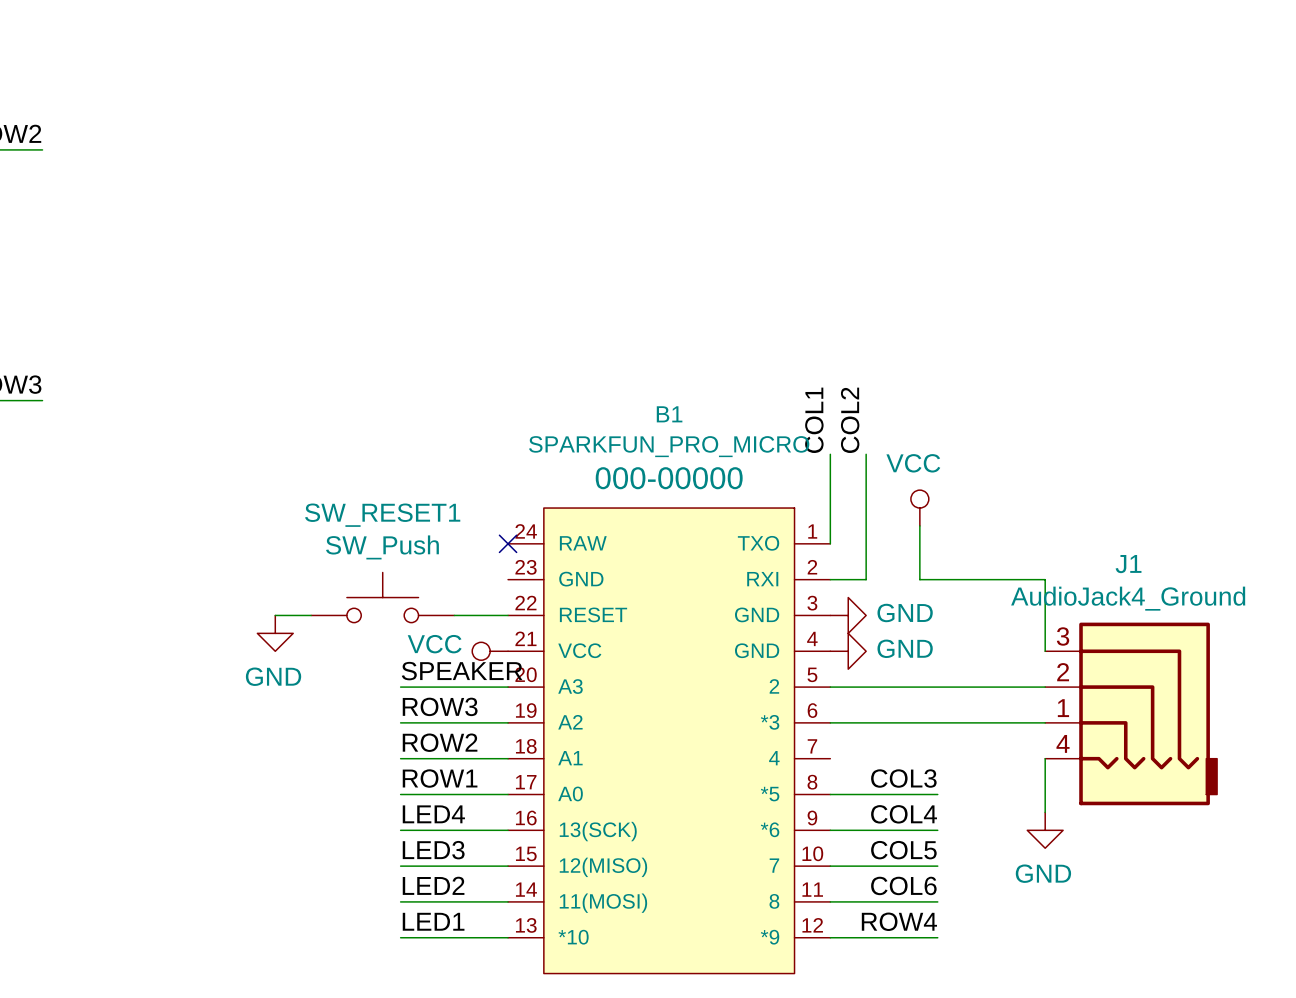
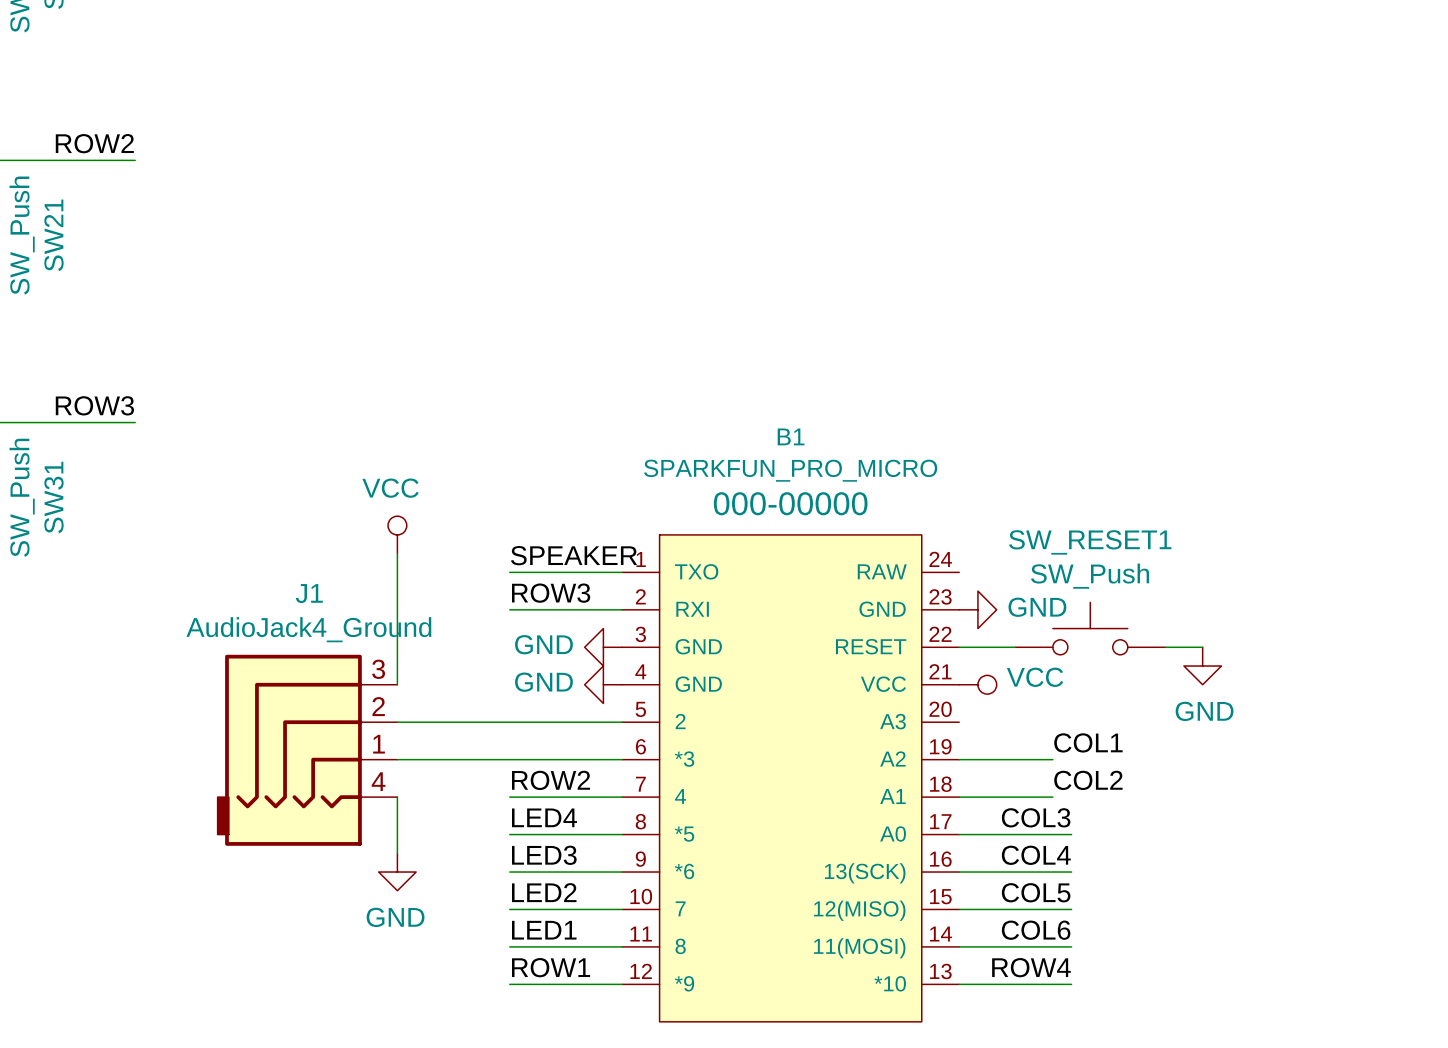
label rotation: 0° (814, 420) -> 90° clockwise (1088, 742)
label position: COL1 (814, 420) -> COL1 (1088, 742)
label rotation: 0° (850, 420) -> 90° clockwise (1088, 780)
label position: COL2 (850, 420) -> COL2 (1088, 780)
wire: (830, 454) (830, 543) -> none
wire: (866, 454) (866, 579) (830, 579) -> none
power symbol: none -> VCC (397, 534)
power symbol: VCC (919, 508) -> none
wire: none -> (397, 553) (397, 684)
wire: (919, 525) (919, 579) (1045, 579) (1045, 651) -> none
wire: none -> (509, 572) (622, 572)
no-connect mark: (508, 543) -> none
wire: none -> (509, 609) (622, 609)
SW_RESET1 position: (382, 597) -> (1090, 628)
wire: (275, 615) (311, 615) -> none
wire: (454, 615) (508, 615) -> none
power symbol: none -> GND (603, 647)
wire: none -> (959, 647) (1015, 647)
power symbol position: GND (848, 615) -> GND (977, 609)
wire: none -> (1165, 647) (1202, 647)
power symbol: GND (275, 633) -> none
power symbol: none -> GND (1202, 666)
power symbol: VCC (490, 651) -> GND (603, 684)
power symbol: GND (848, 651) -> VCC (977, 684)
label position: SPEAKER (462, 671) -> SPEAKER (574, 555)
wire: none -> (397, 722) (509, 722)
wire: (830, 687) (1045, 687) -> none
label position: ROW3 (440, 706) -> ROW3 (551, 593)
J1 position: (1131, 713) -> (307, 750)
J1 flip: as is (1148, 713) -> left-right (289, 750)
wire: none -> (397, 759) (509, 759)
wire: (919, 722) (1045, 722) -> none
B1 flip: as is (669, 740) -> left-right (790, 778)
wire: none -> (397, 797) (397, 853)
wire: none -> (959, 797) (1052, 797)
wire: (1045, 758) (1045, 812) -> none
label: ROW1 (440, 778) -> LED4 (544, 817)
label: LED4 (433, 814) -> LED3 (544, 855)
power symbol: none -> GND (397, 872)
power symbol: GND (1045, 830) -> none
label: LED3 (433, 850) -> LED2 (544, 892)
label: LED2 (433, 885) -> LED1 (544, 930)
label: LED1 (433, 921) -> ROW1 (551, 967)

